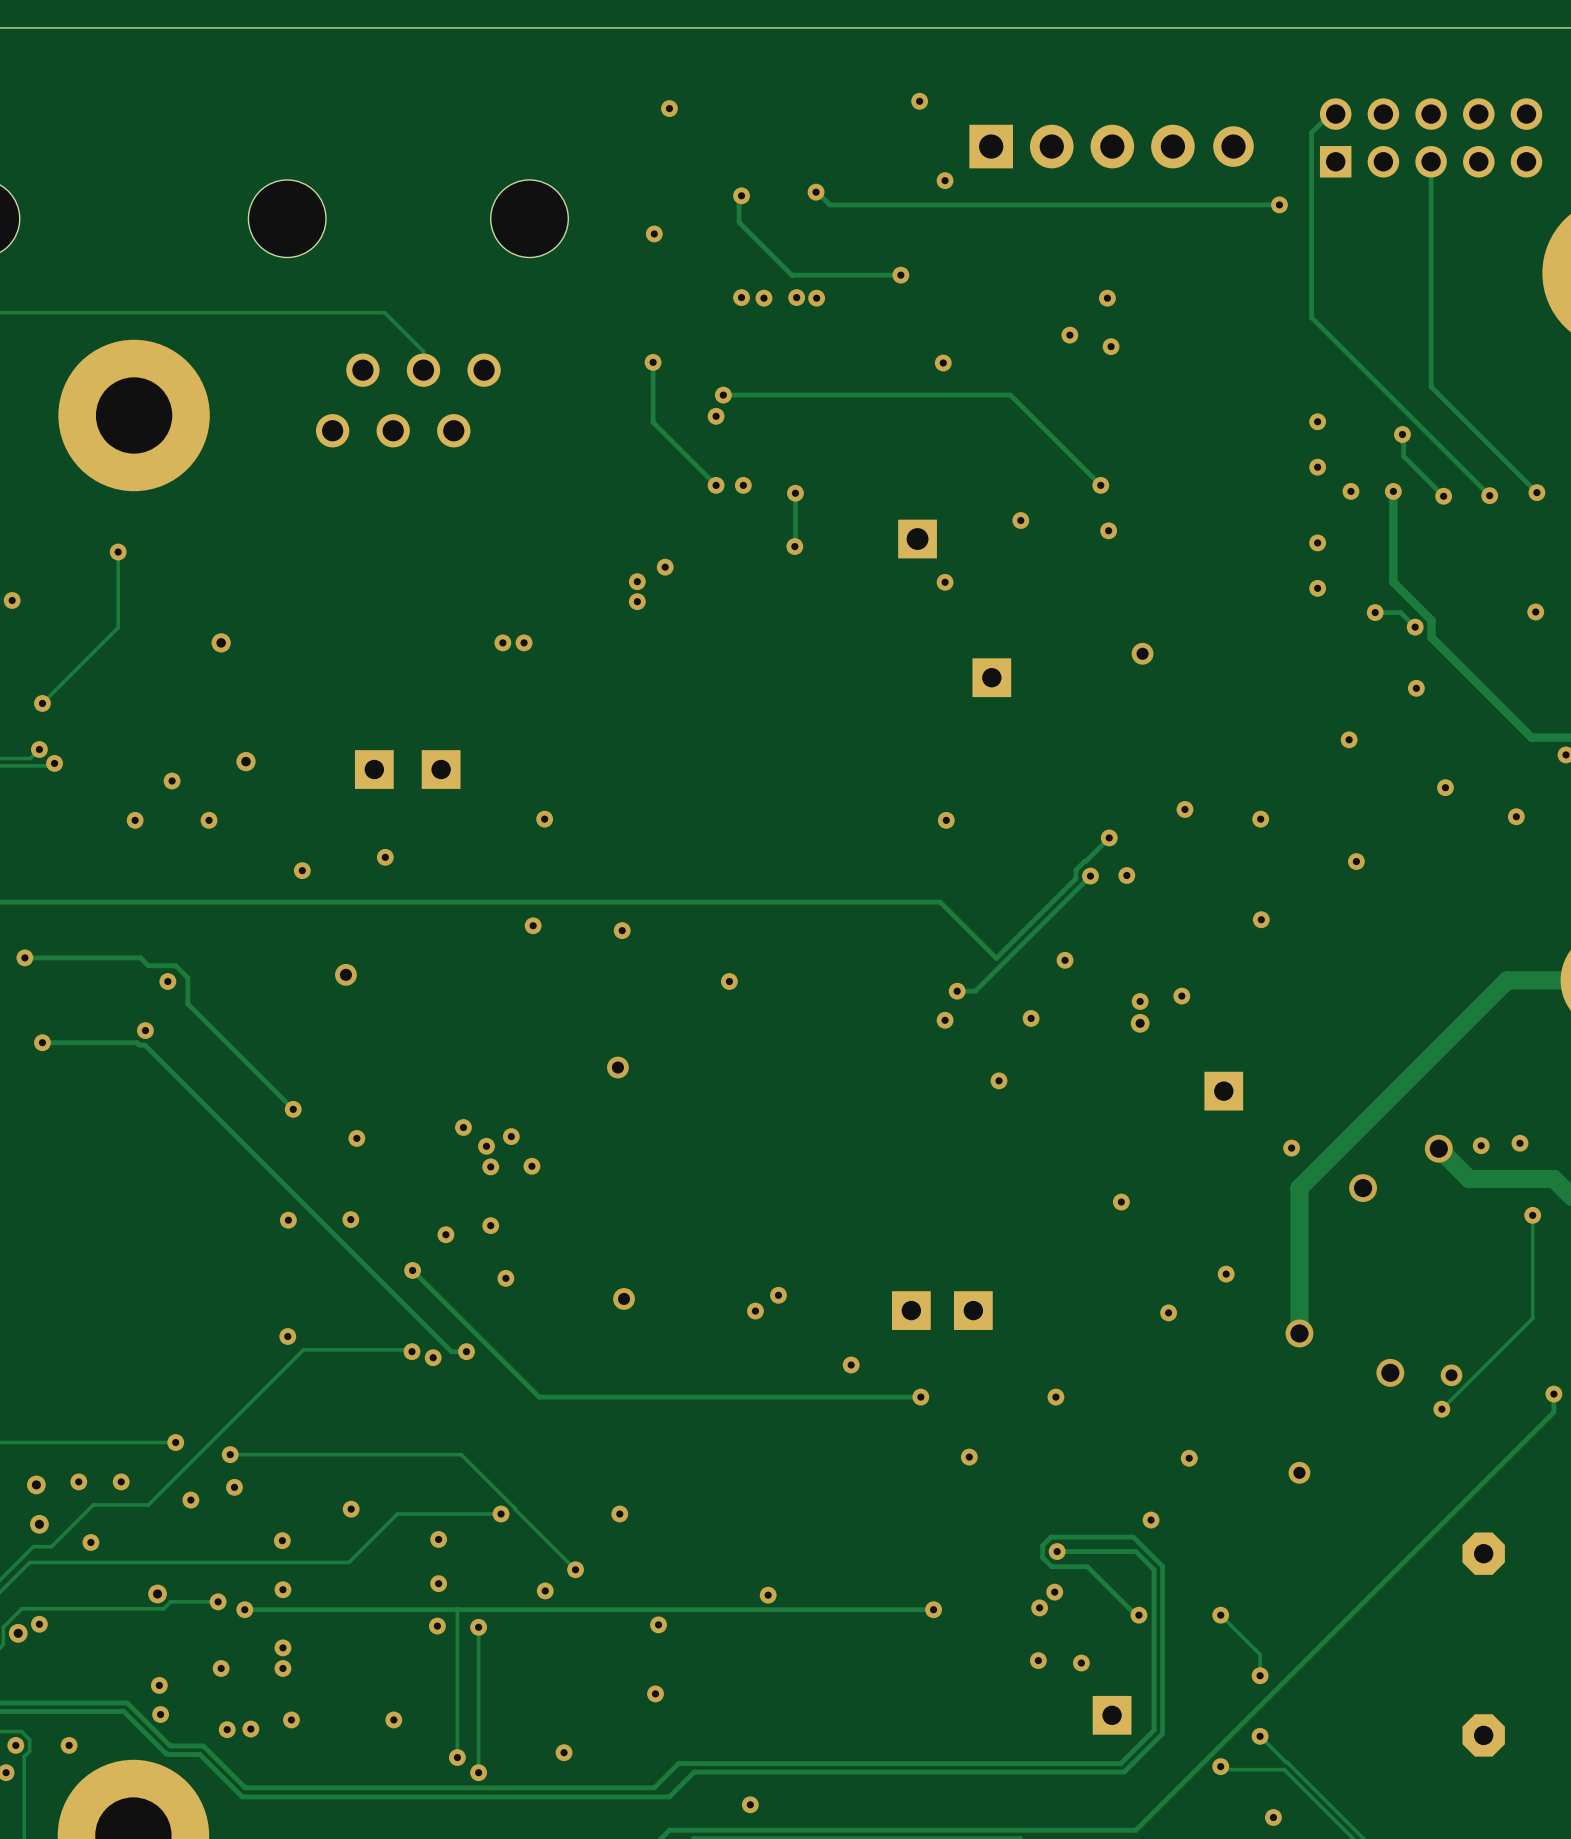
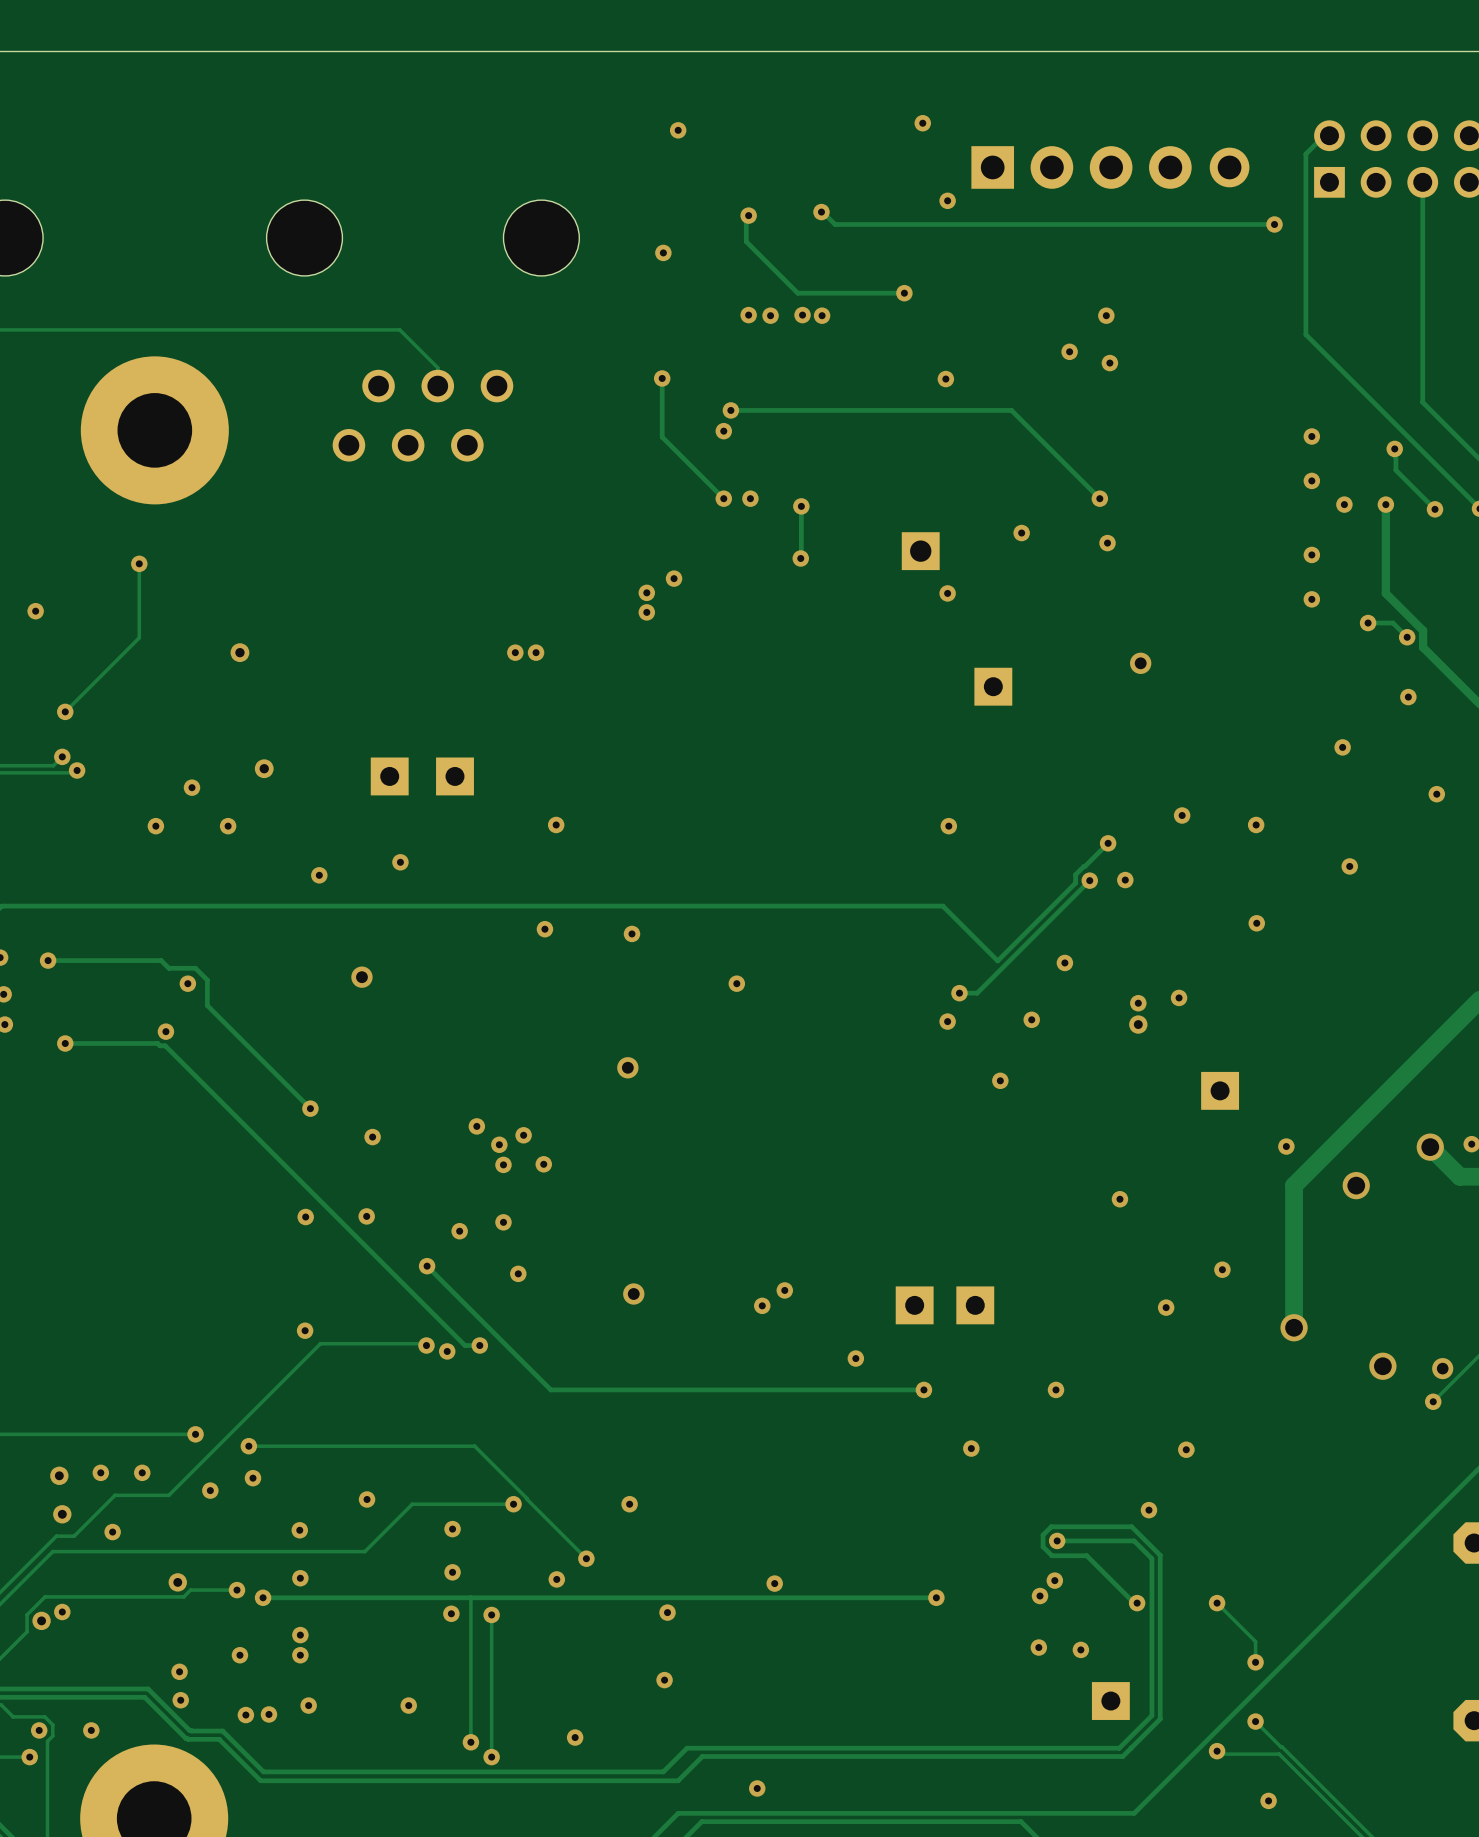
via: (1299, 1472) -> none

